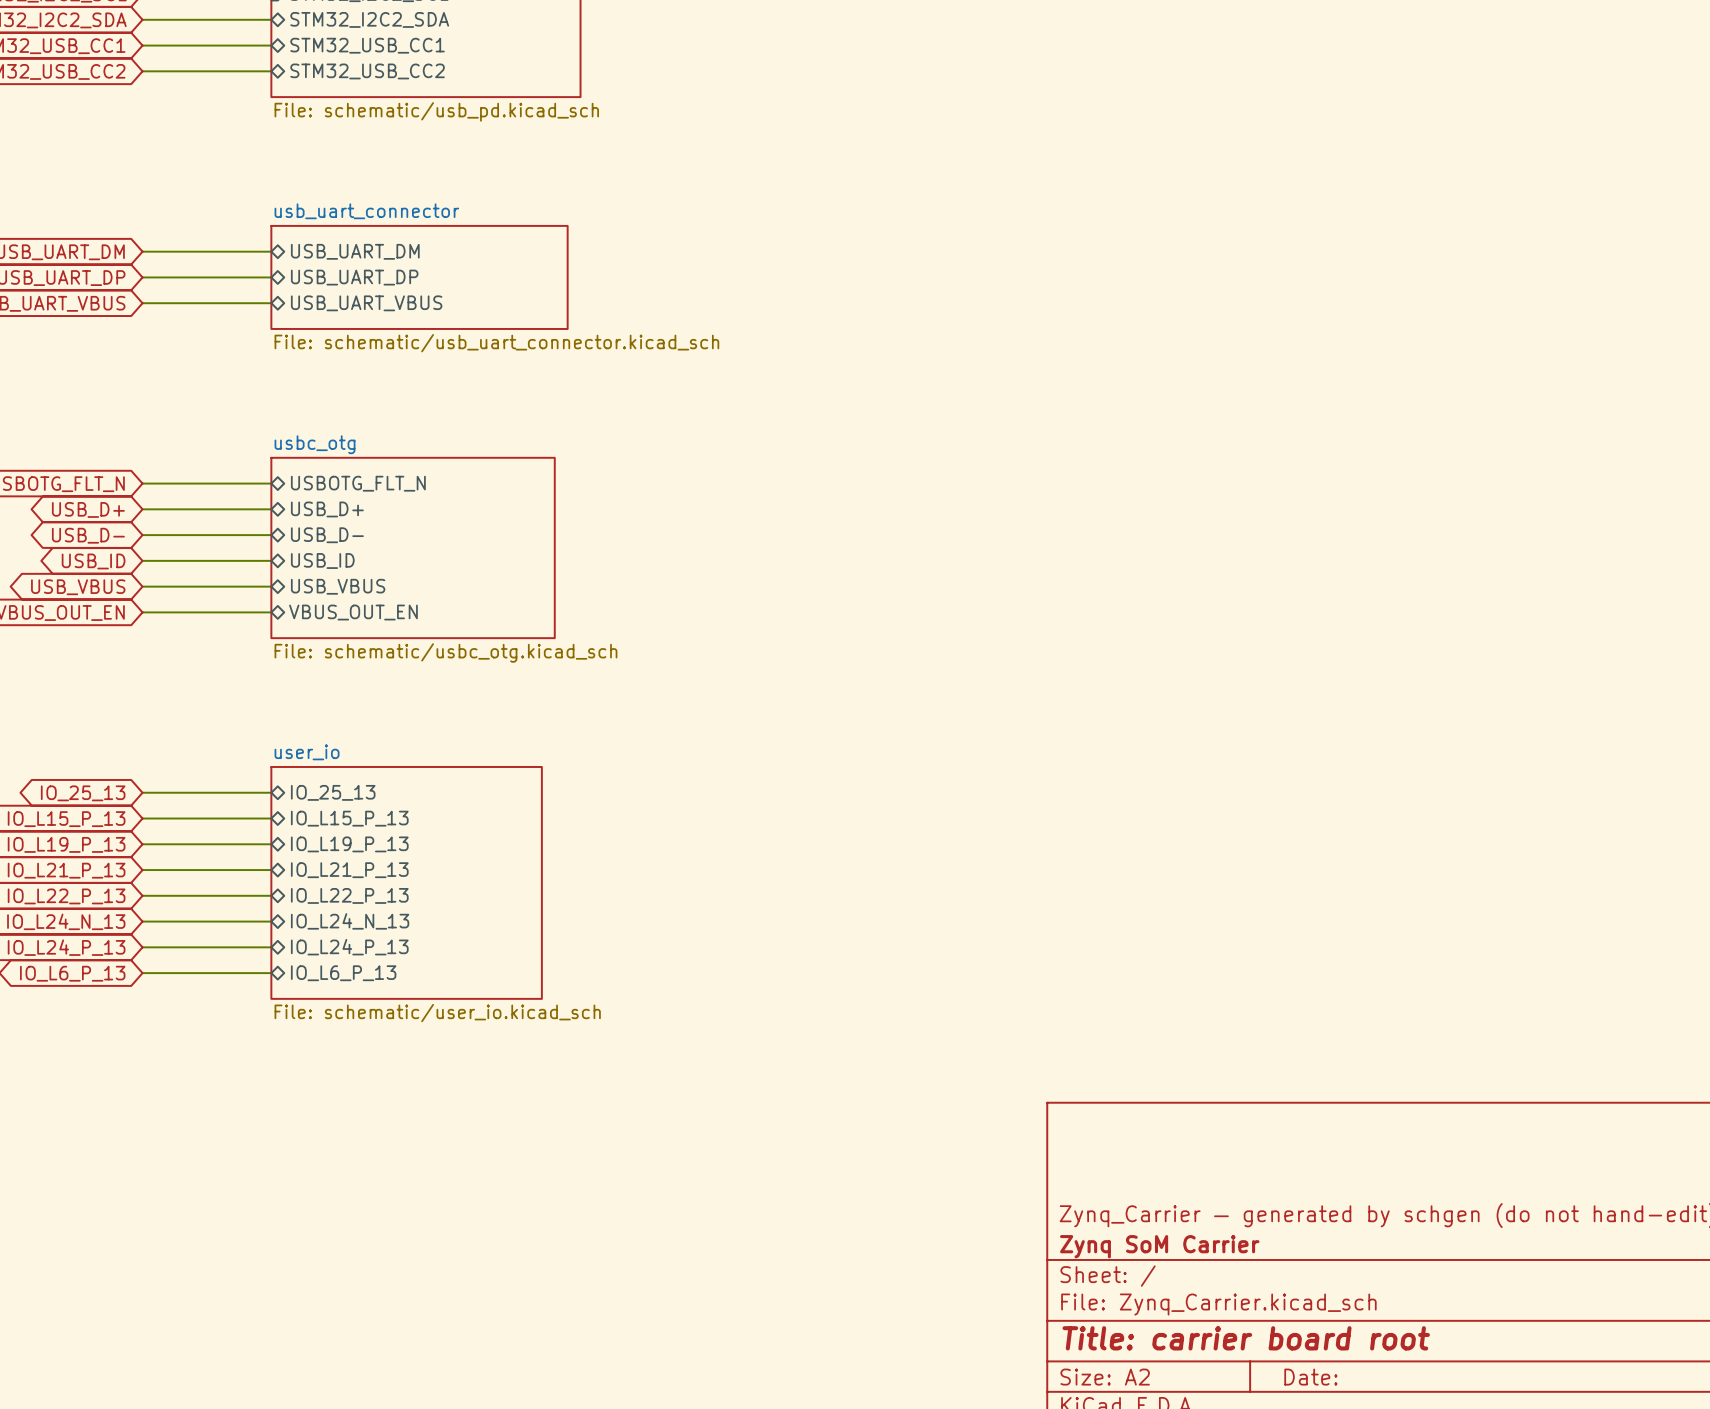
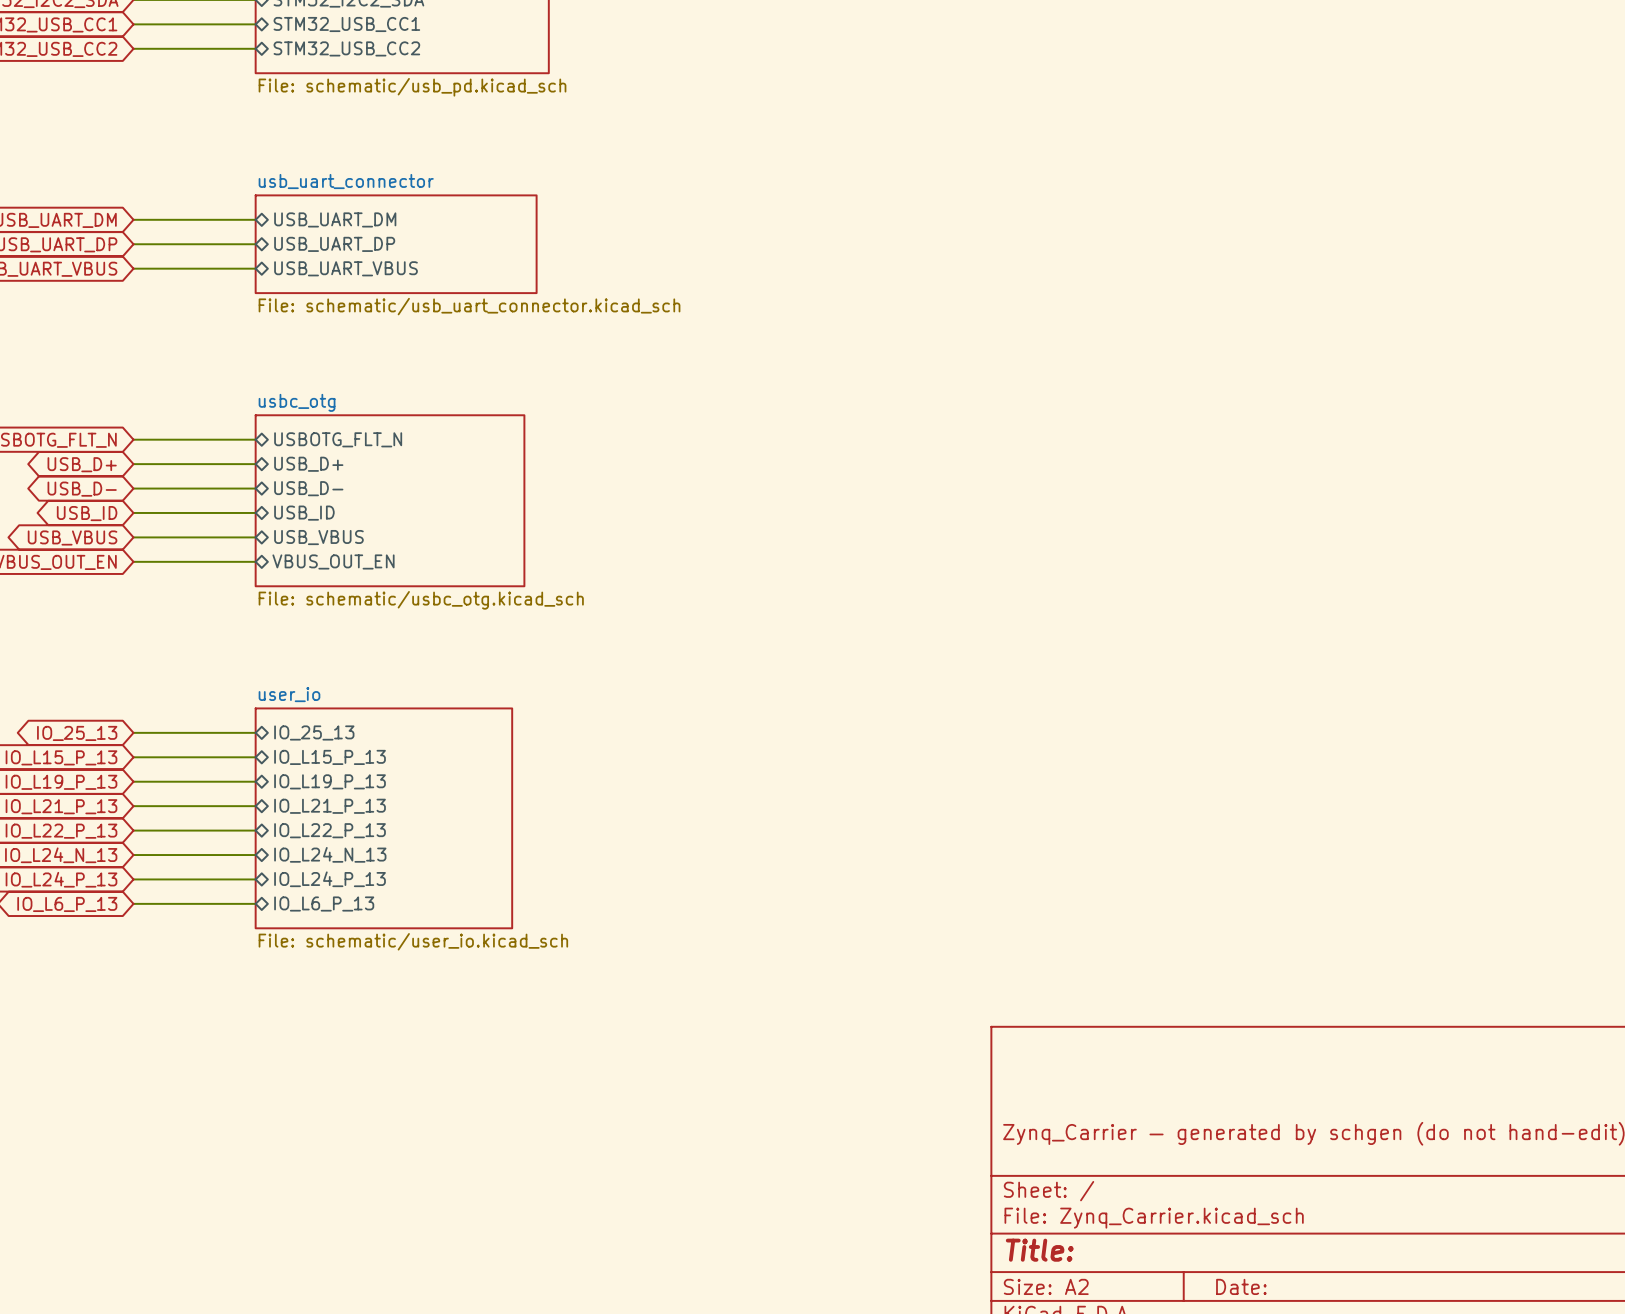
title block: Zynq SoM Carrier (1159, 1246) -> none
title block: Title: carrier board root (1246, 1338) -> Title: (1039, 1250)

